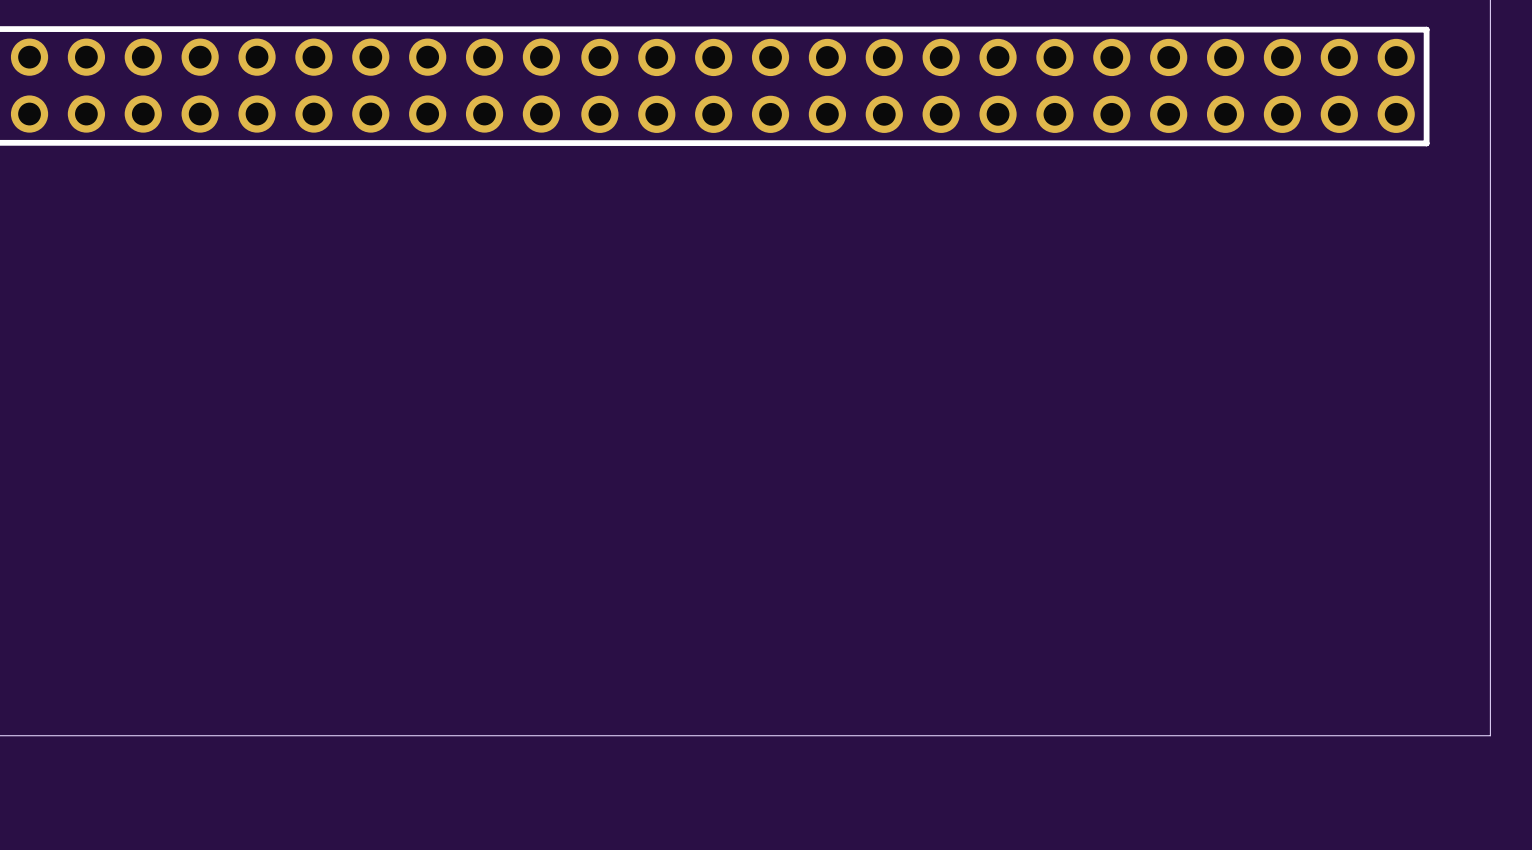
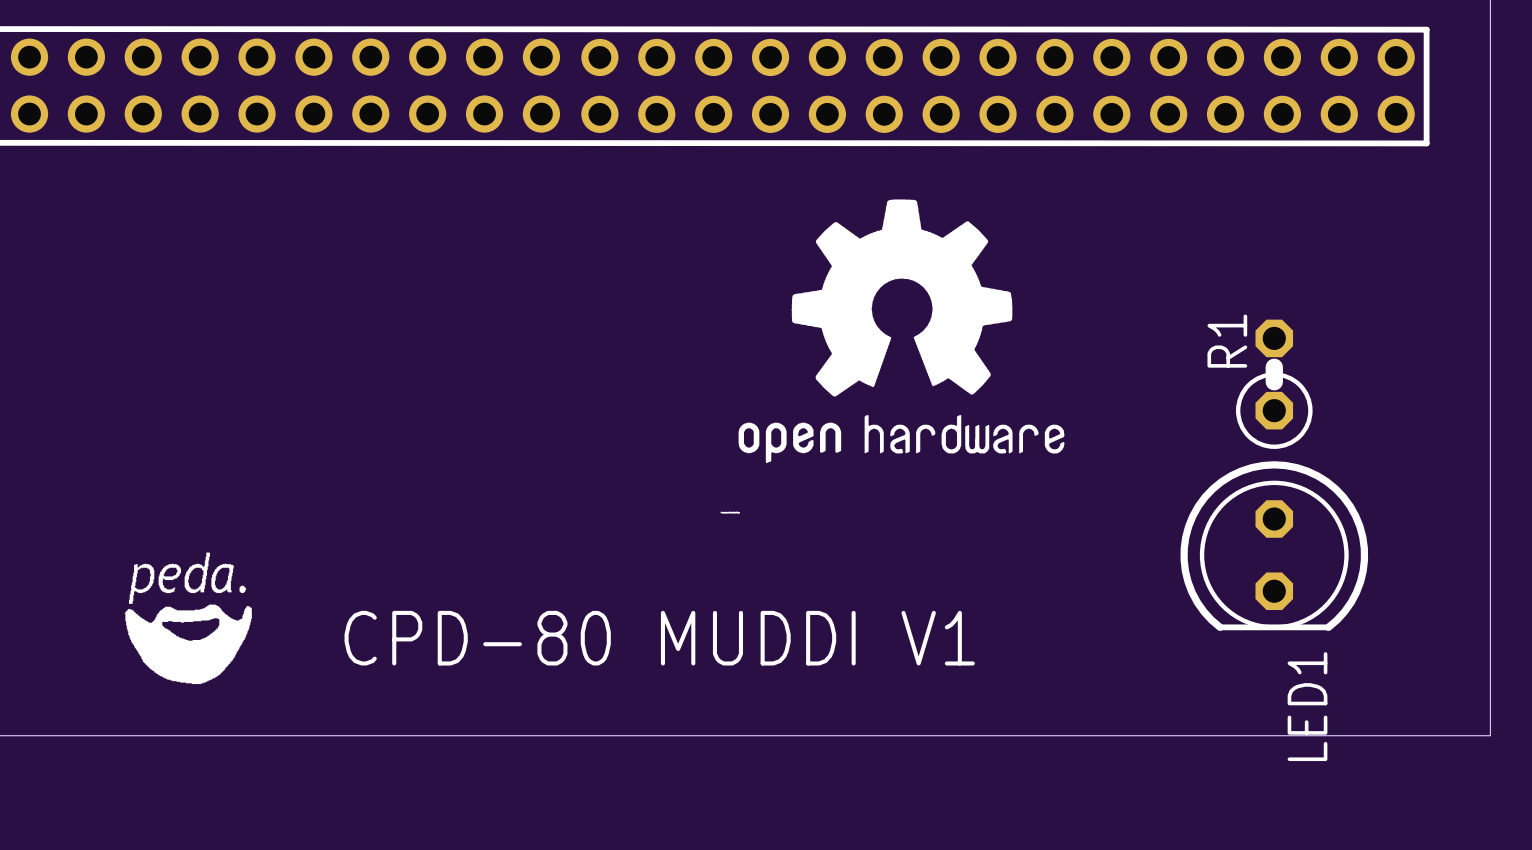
drawing: none -> [738, 199, 1065, 463]
R1: none -> (1274, 384)
LED1: none -> (1274, 546)
drawing: none -> [124, 552, 252, 685]
text: none -> CPD-80 MUDDI V1 (659, 638)

